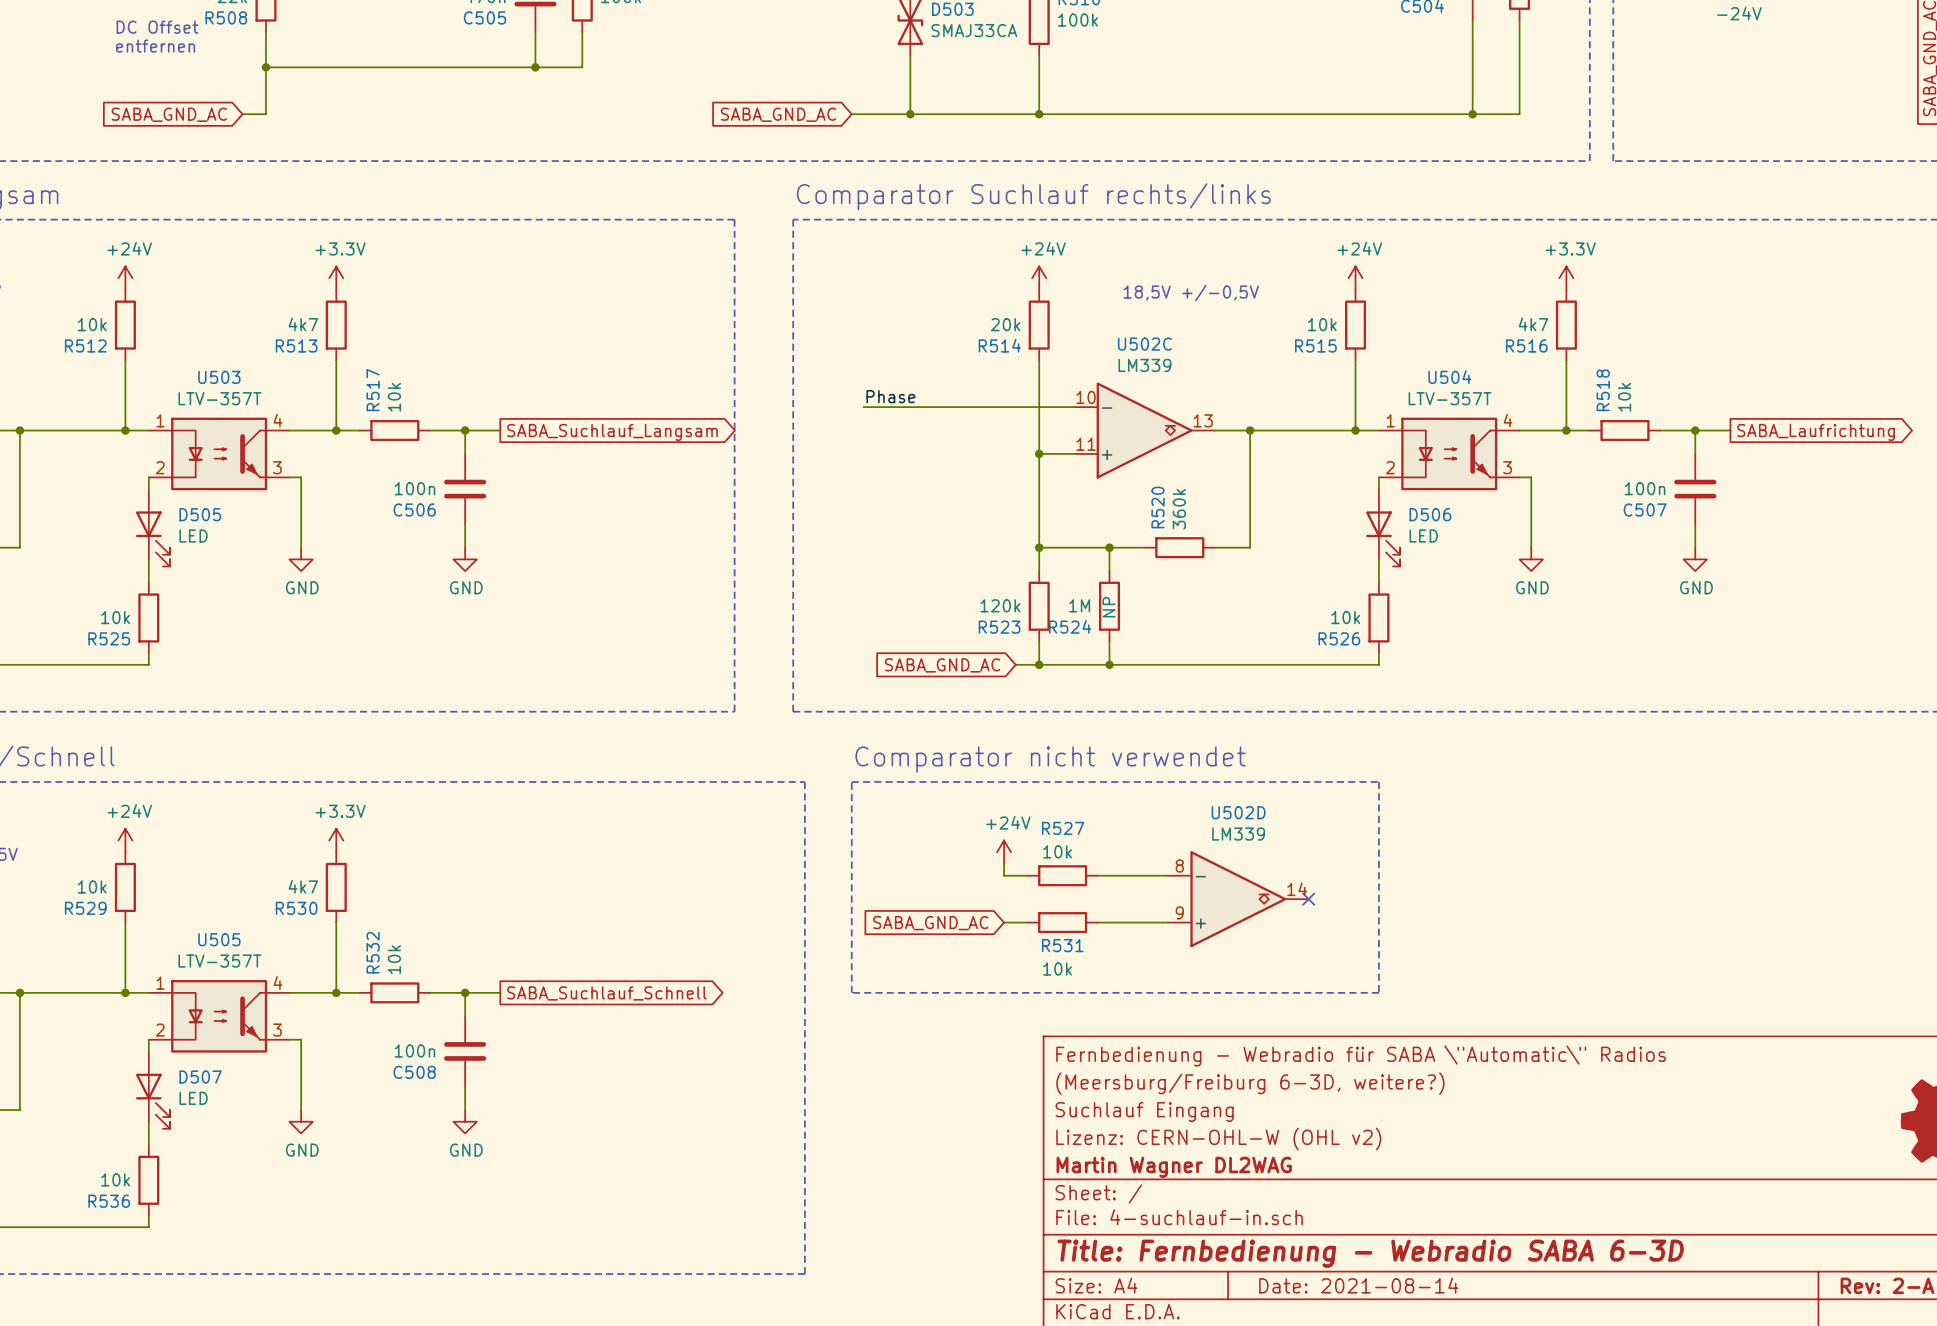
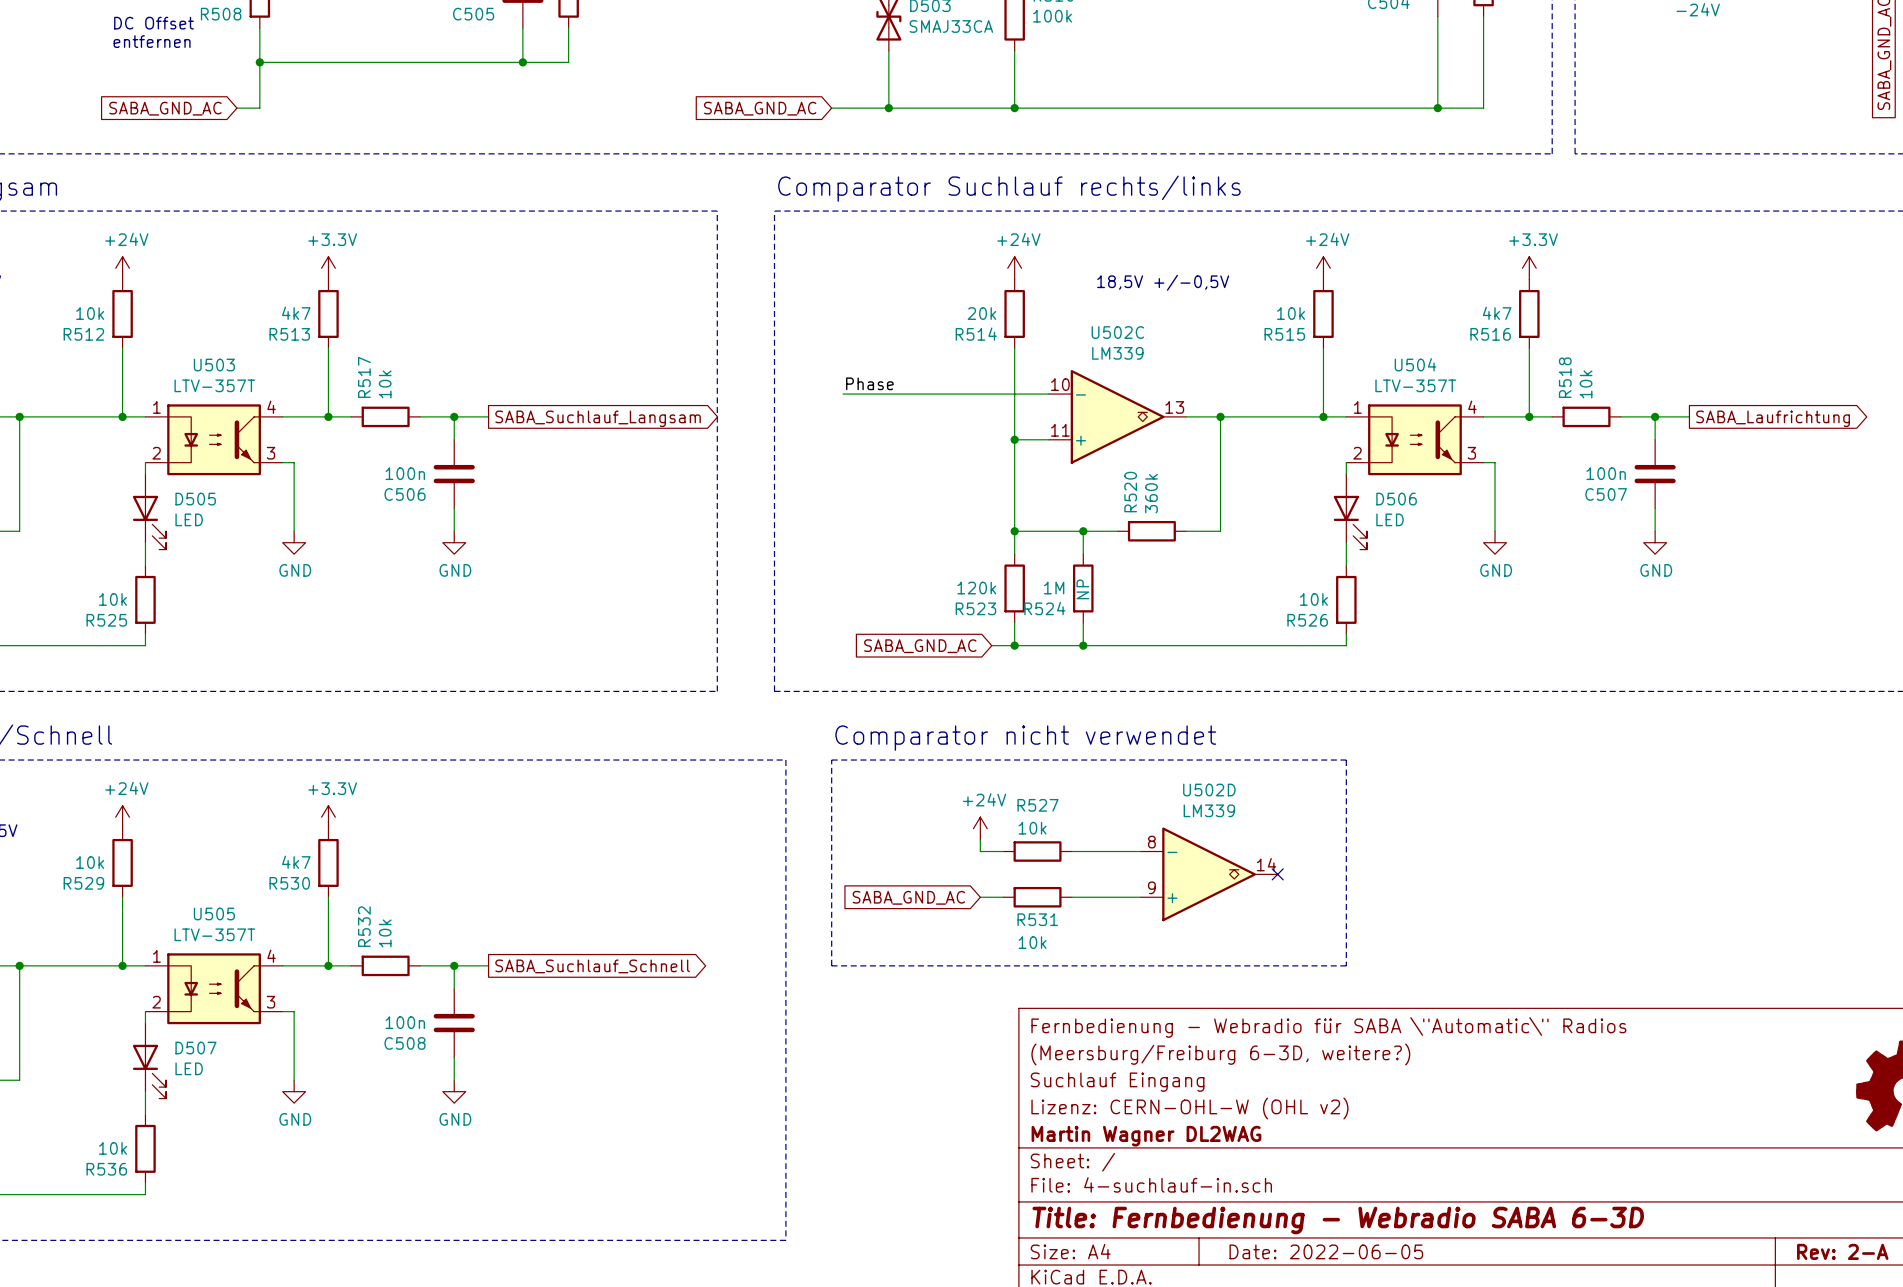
title block: Date: 2021-08-14 (1358, 1285) -> Date: 2022-06-05 (1326, 1251)

